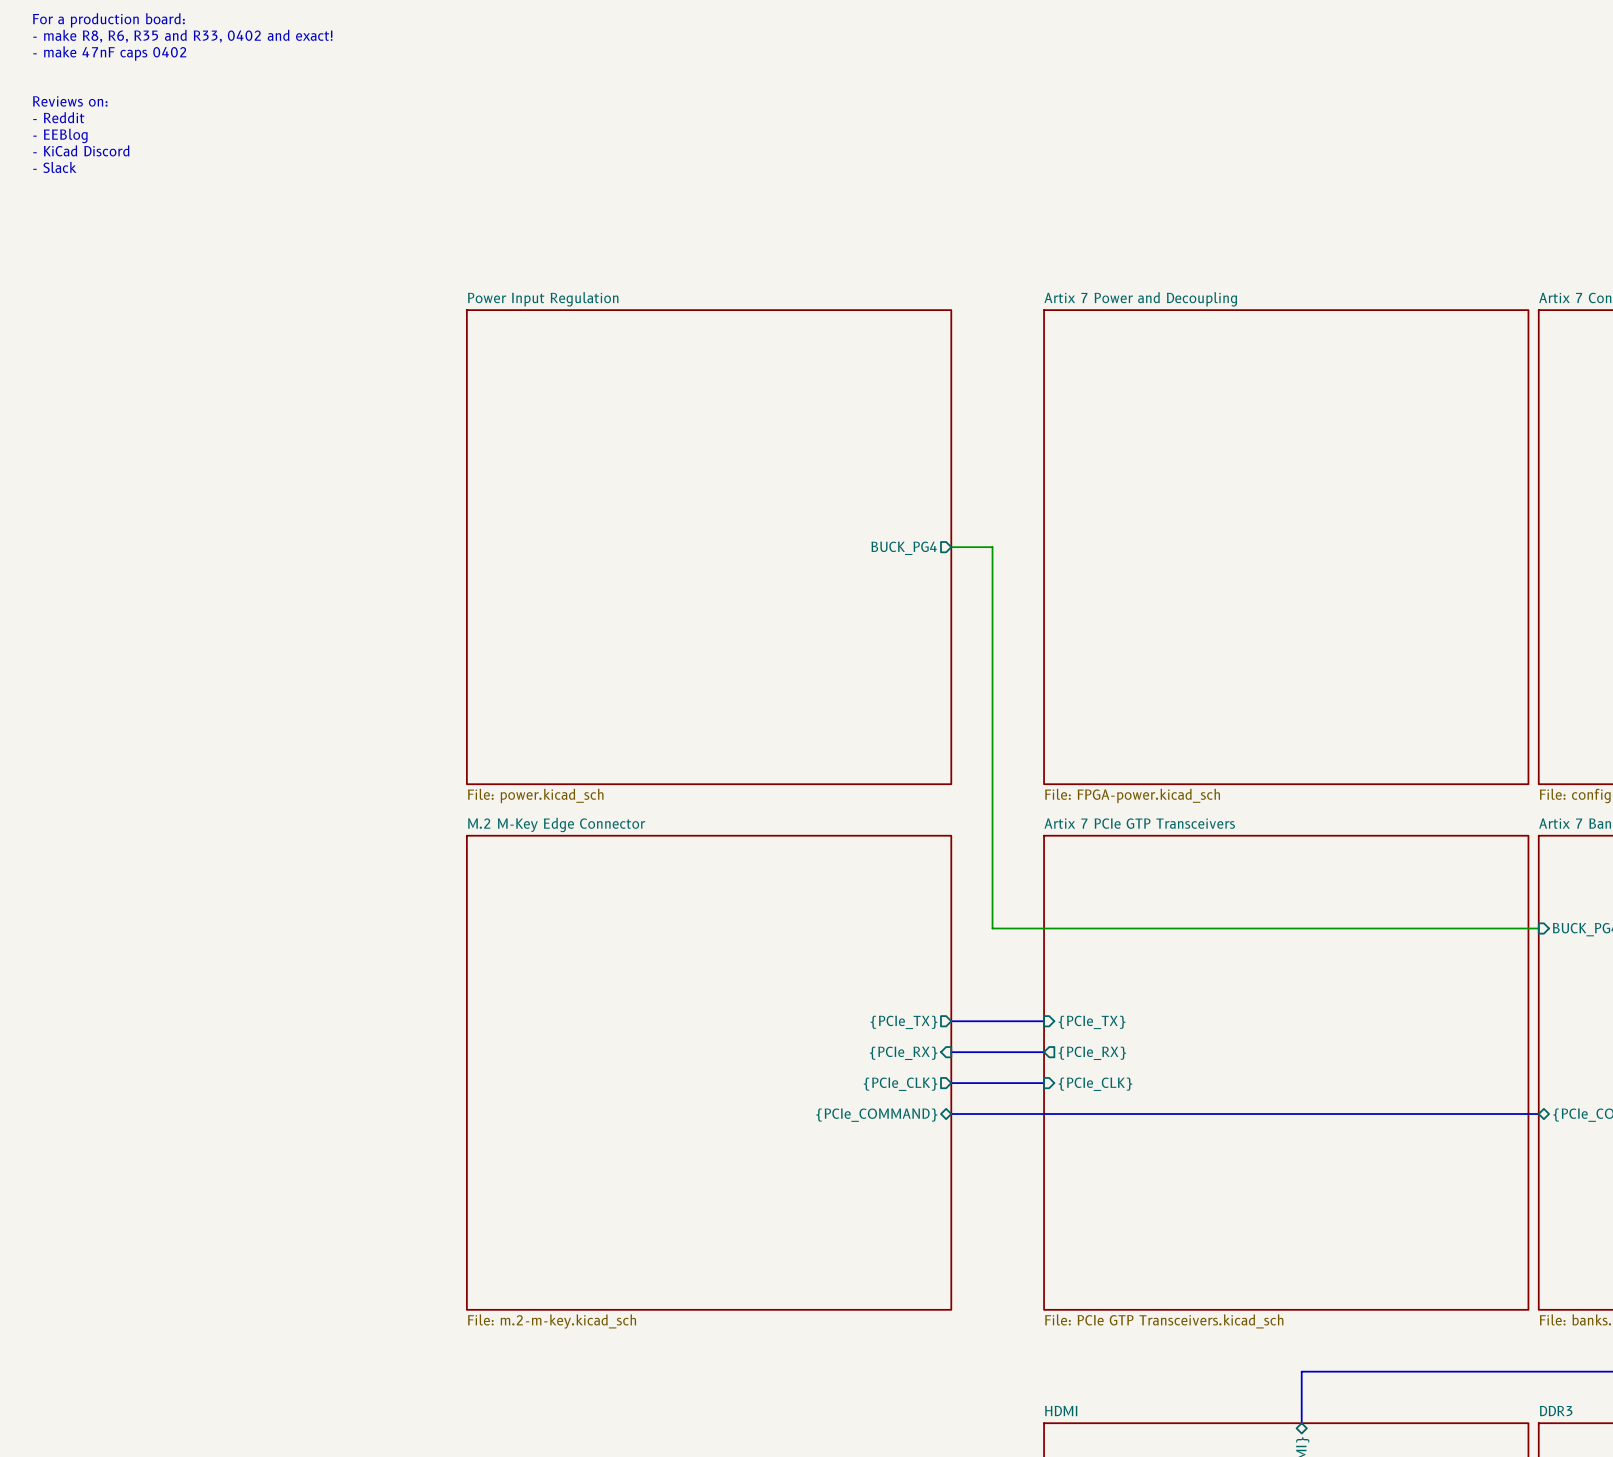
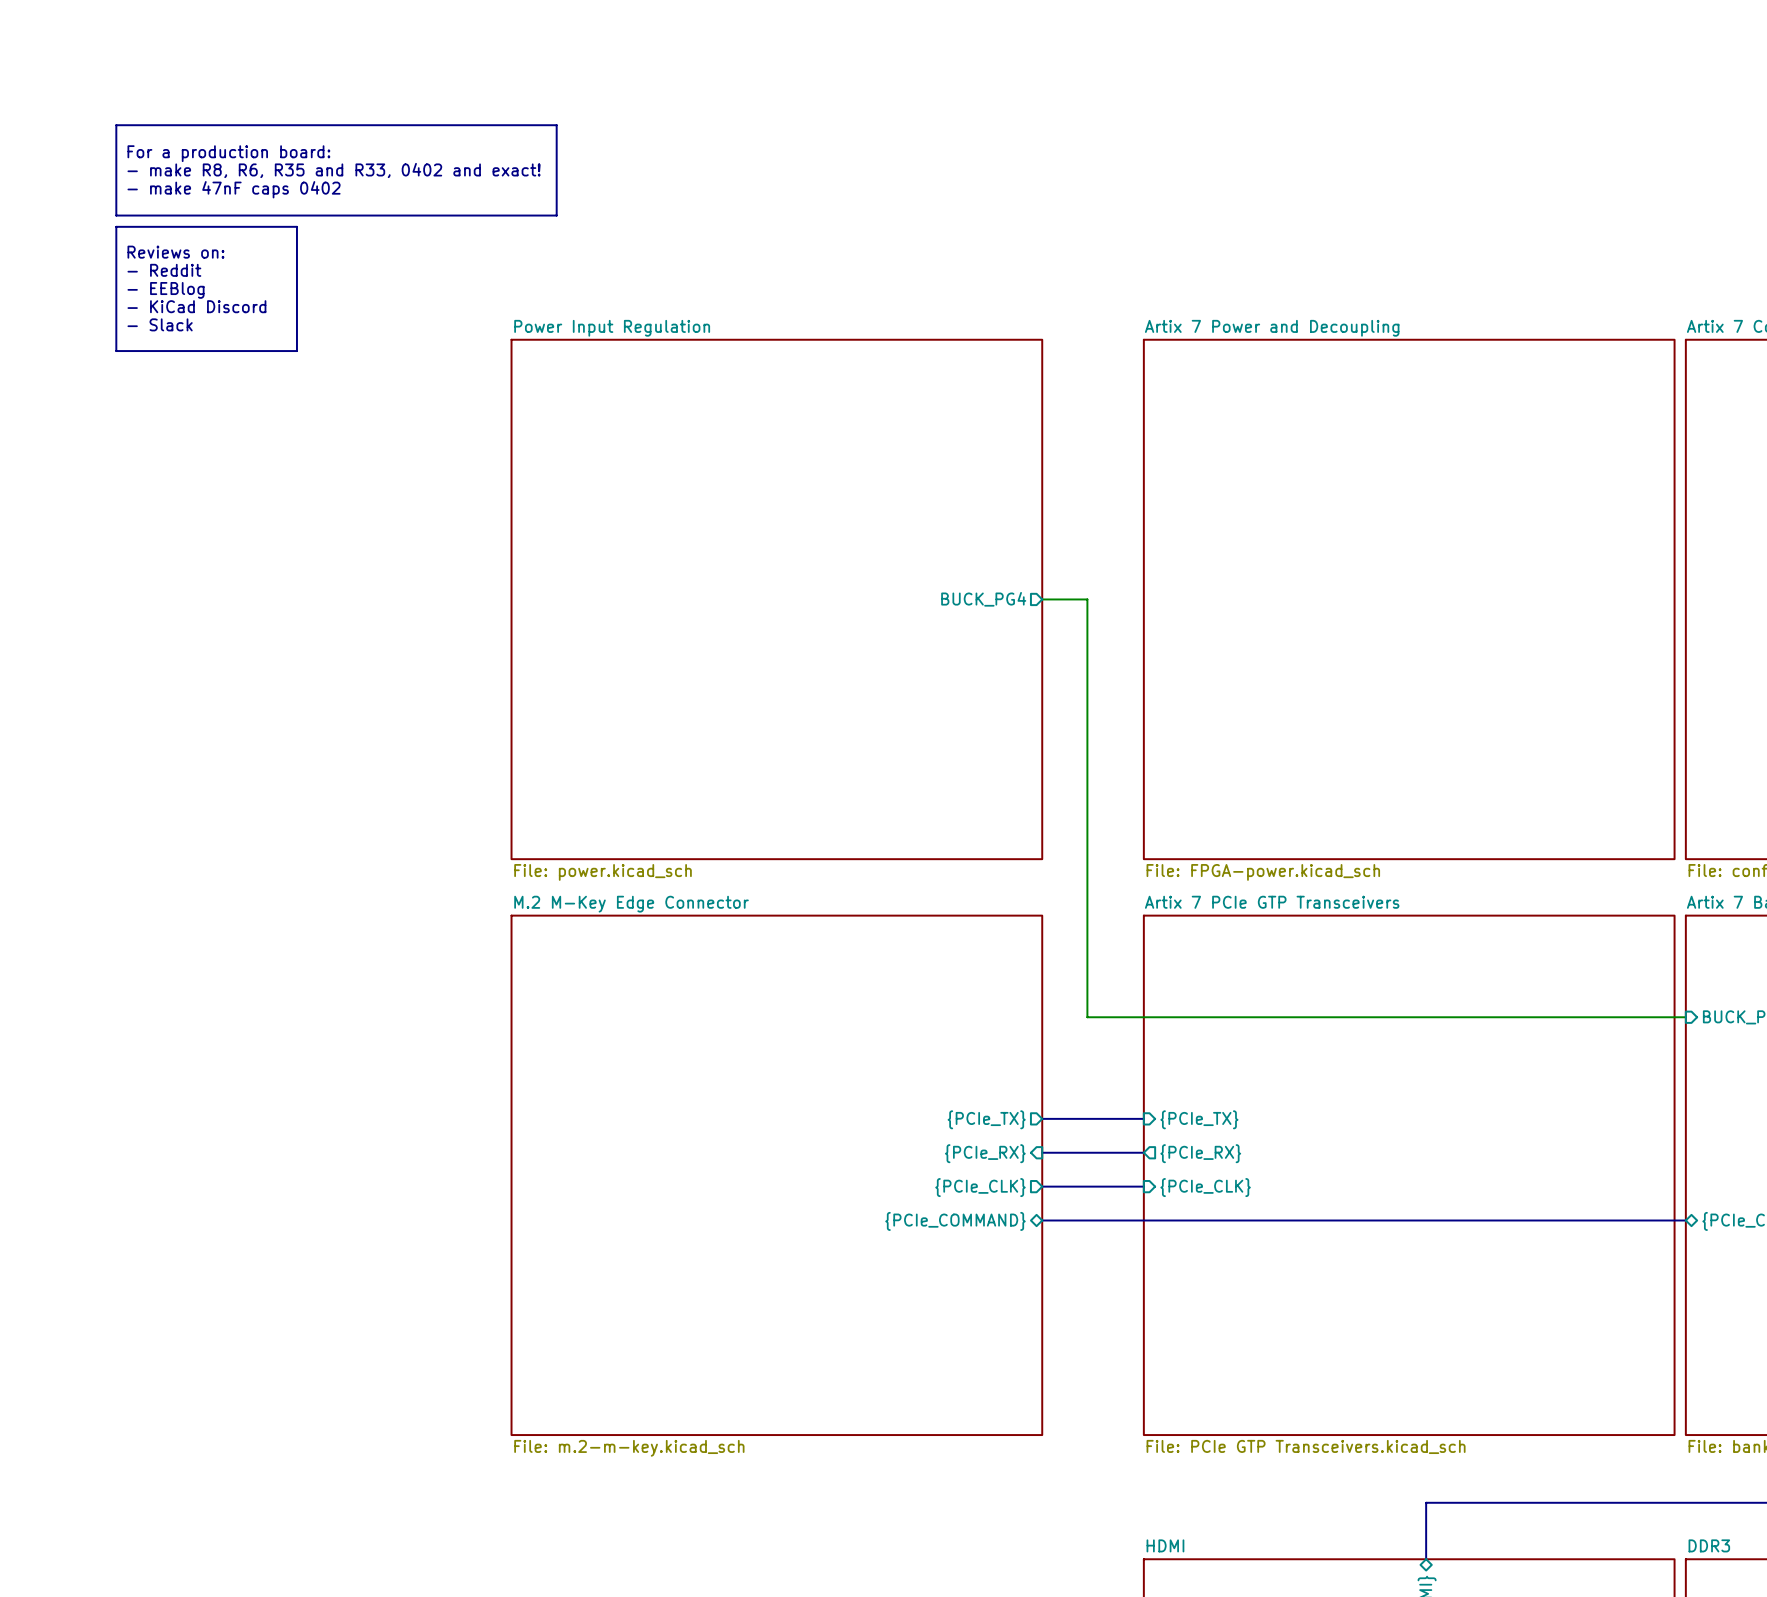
text position: For a production board: (108, 20) -> For a production board: (228, 153)
text position: - make R8, R6, R35 and R33, 0402 and exact! (182, 36) -> - make R8, R6, R35 and R33, 0402 and exact! (334, 170)
text position: - make 47nF caps 0402 (109, 53) -> - make 47nF caps 0402 (234, 189)
text position: Reviews on: (70, 101) -> Reviews on: (175, 252)
line: none -> (116, 125) (556, 125) (556, 215) (116, 215) (116, 125)
text position: - Reddit (58, 117) -> - Reddit (164, 270)
text position: - EEBlog (60, 135) -> - EEBlog (166, 290)
text position: - KiCad Discord (81, 150) -> - KiCad Discord (196, 306)
text position: - Slack (54, 167) -> - Slack (160, 324)
line: none -> (116, 226) (116, 351) (296, 351) (296, 226) (116, 226)

